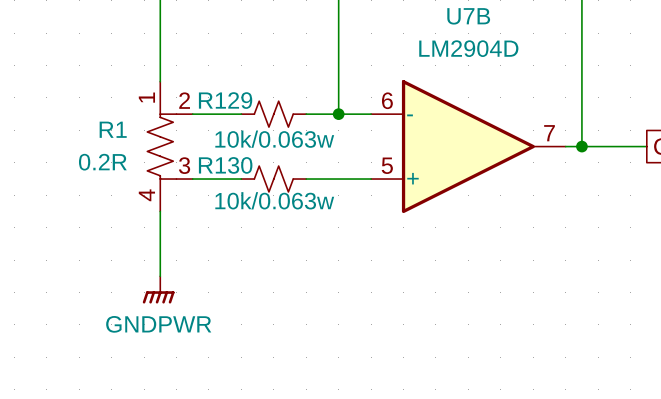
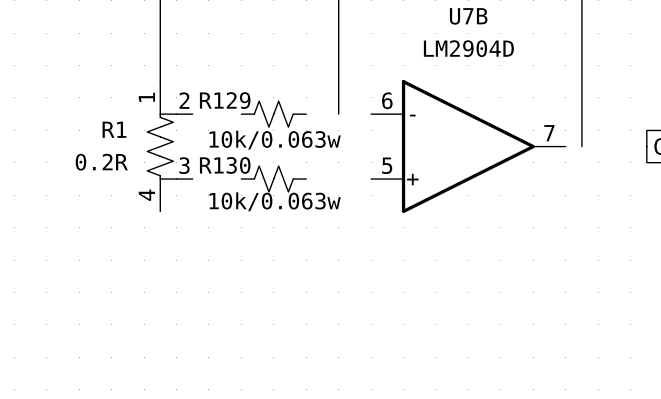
wire: (192, 114) (241, 114) -> none
wire: (306, 114) (371, 114) -> none
junction: (338, 114) -> none
wire: (565, 146) (646, 146) -> none
junction: (581, 146) -> none
wire: (192, 179) (241, 179) -> none
wire: (306, 179) (371, 179) -> none
wire: (160, 211) (160, 276) -> none
power symbol: GNDPWR (158, 289) -> none

